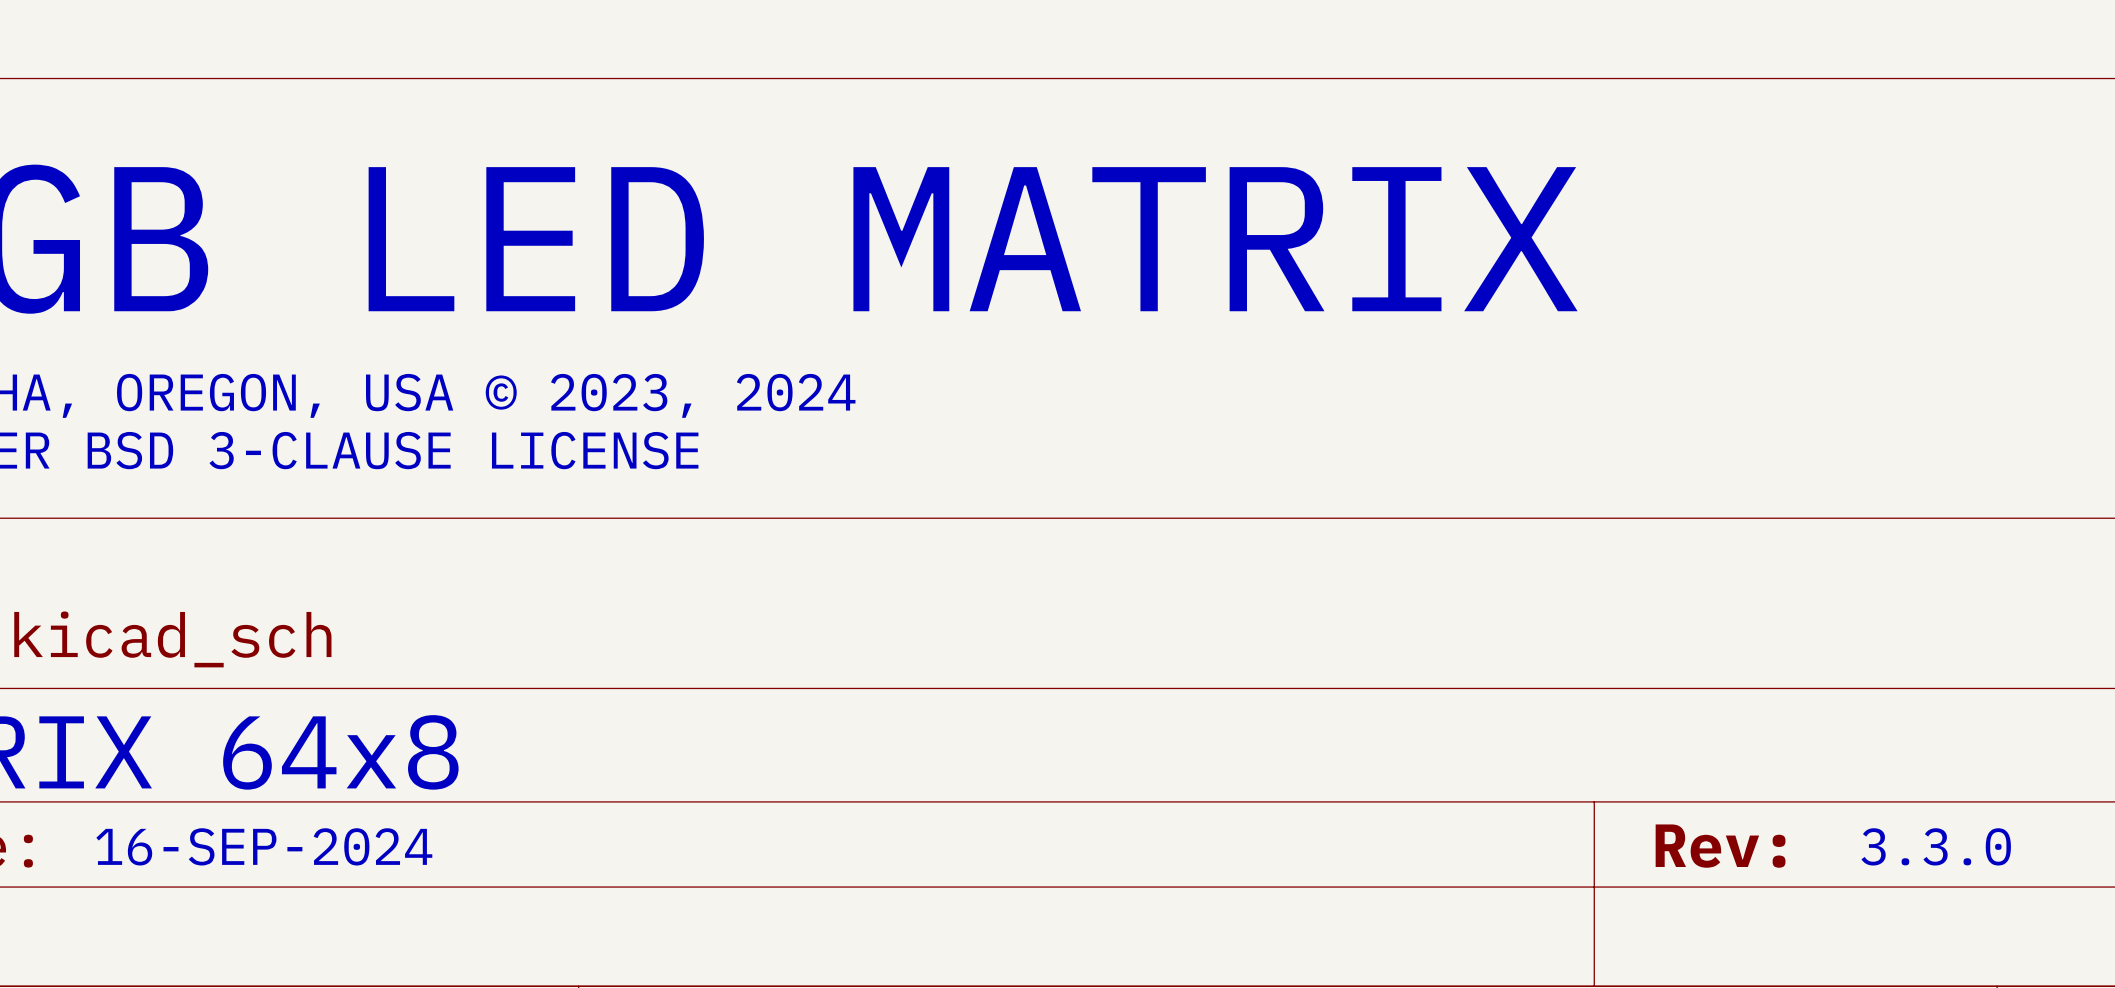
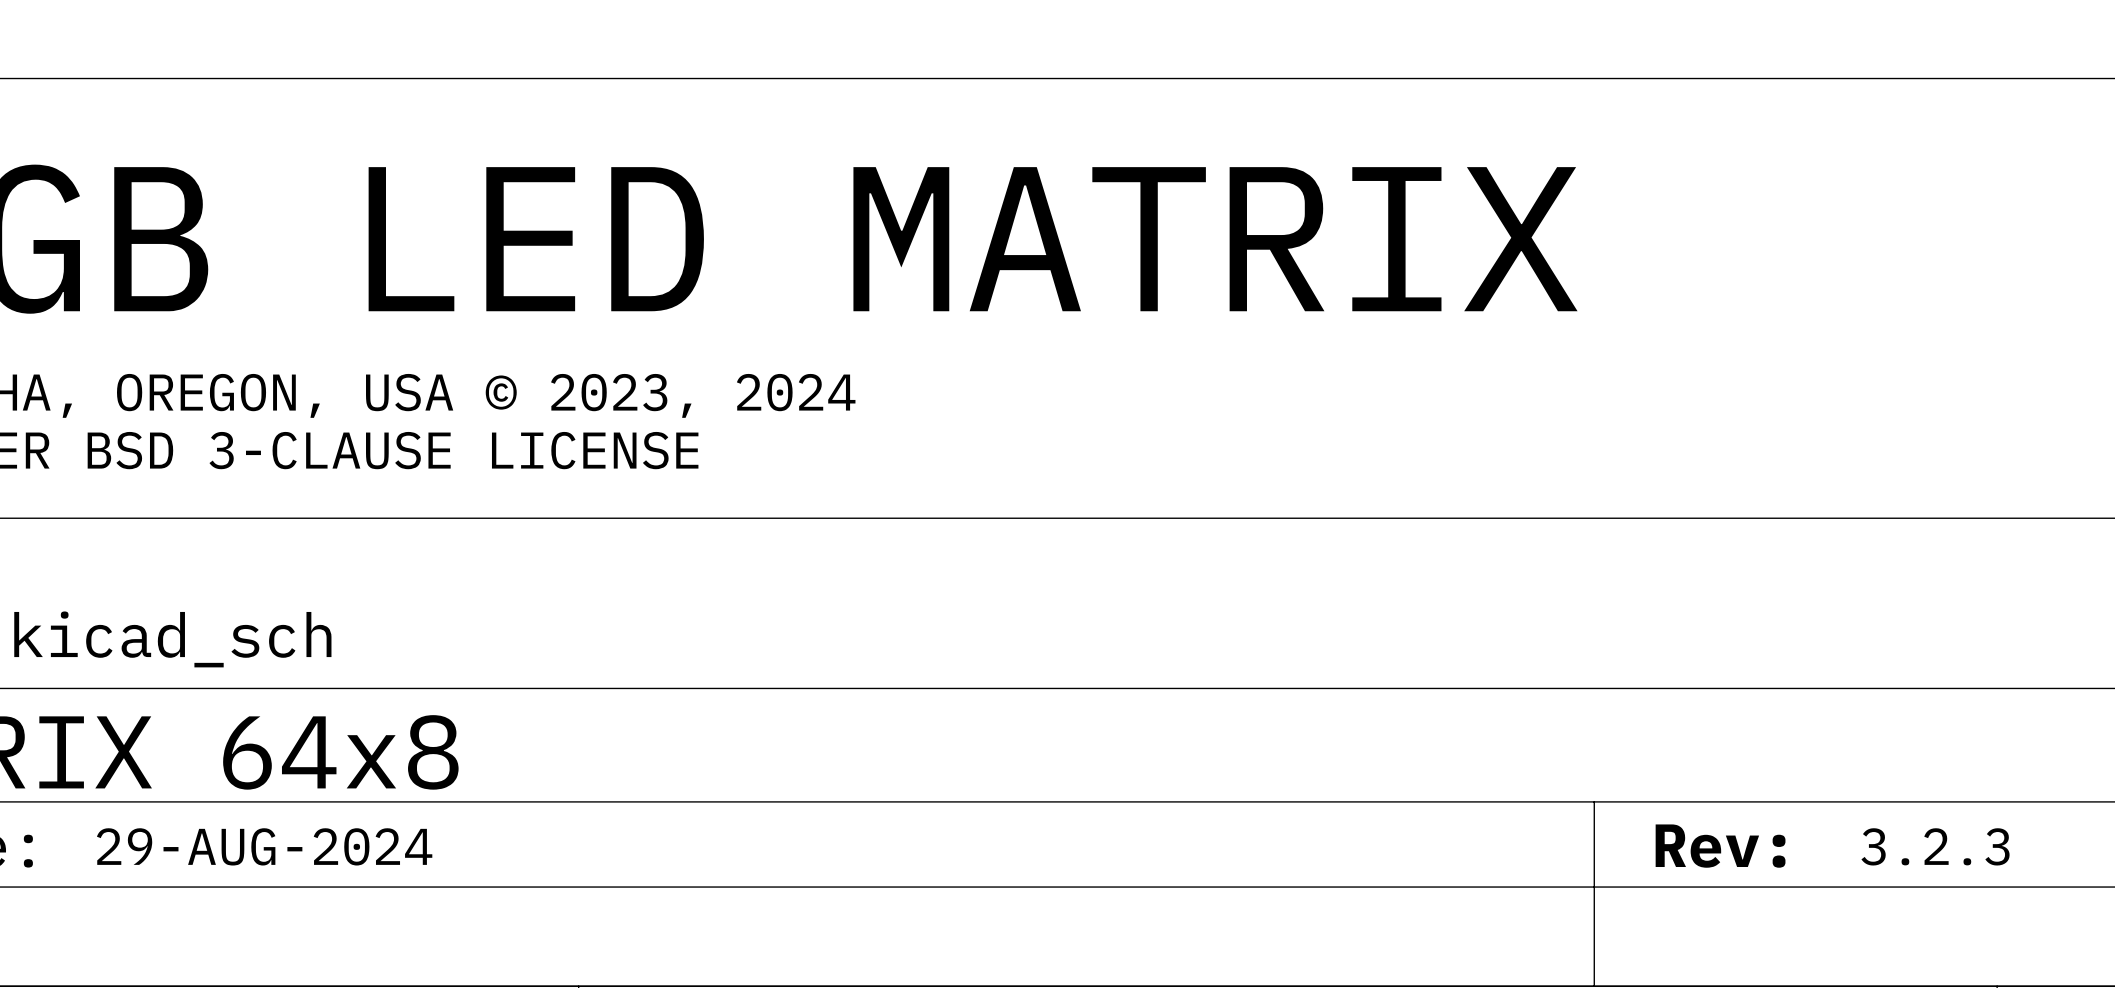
text: 16-SEP-2024 (264, 846) -> 29-AUG-2024 (264, 846)
text: 3.3.0 (1936, 846) -> 3.2.3 (1935, 846)

